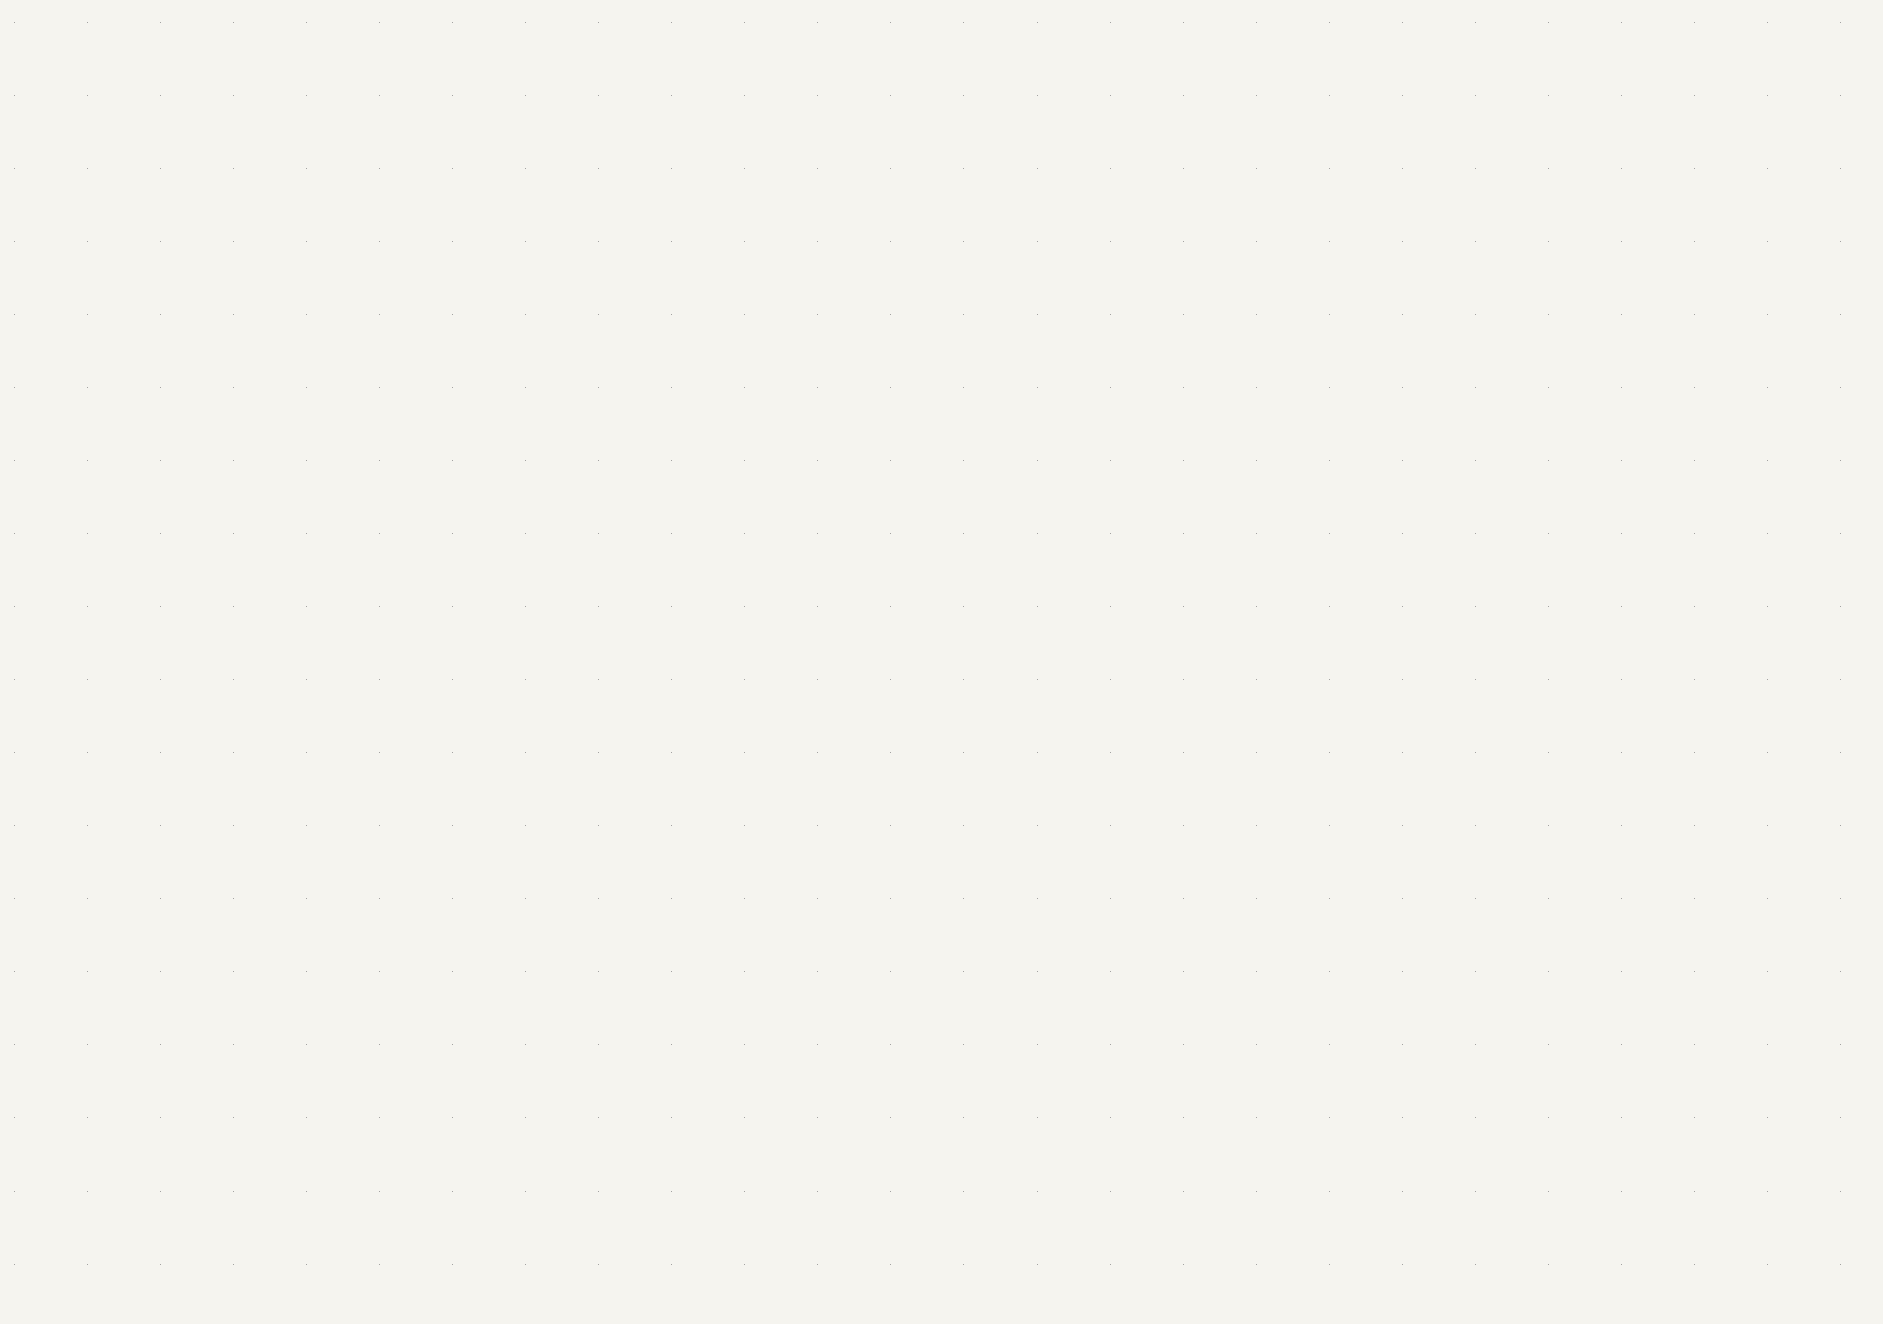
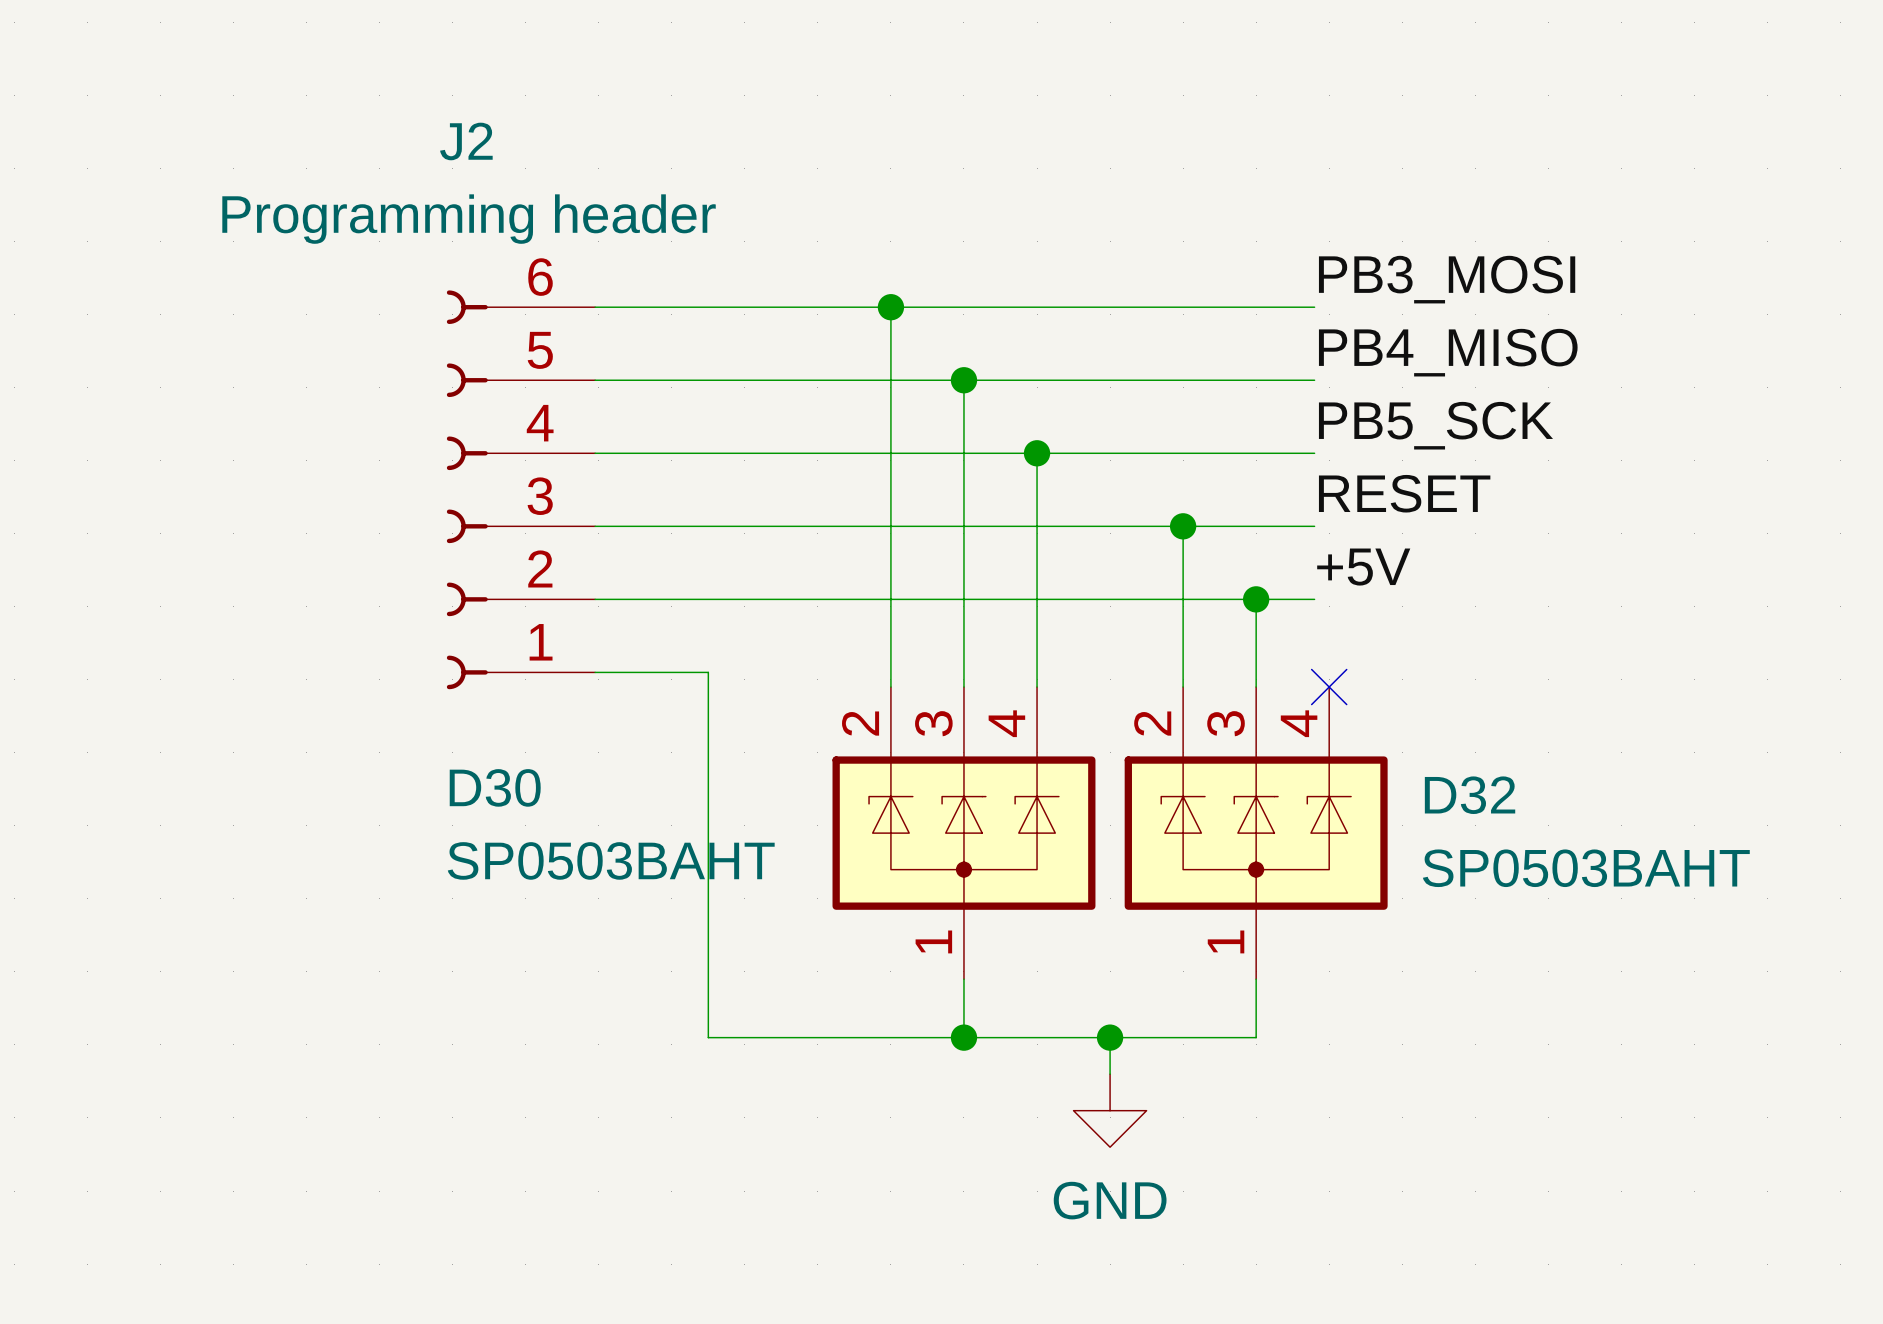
label: none -> PB3_MOSI (1447, 279)
wire: none -> (595, 307) (1314, 307)
wire: none -> (890, 307) (890, 687)
junction: none -> (890, 307)
label: none -> PB4_MISO (1448, 352)
wire: none -> (595, 380) (1314, 380)
wire: none -> (963, 380) (963, 687)
junction: none -> (963, 380)
label: none -> PB5_SCK (1435, 425)
wire: none -> (595, 453) (1314, 453)
wire: none -> (1037, 453) (1037, 687)
junction: none -> (1037, 453)
J2: none -> Programming header (520, 489)
label: none -> RESET (1404, 493)
wire: none -> (595, 526) (1314, 526)
wire: none -> (1183, 526) (1183, 687)
junction: none -> (1183, 526)
label: none -> +5V (1363, 567)
wire: none -> (595, 599) (1314, 599)
wire: none -> (1256, 599) (1256, 687)
junction: none -> (1256, 599)
wire: none -> (595, 672) (708, 672) (708, 1037) (1256, 1037) (1256, 979)
no-connect mark: none -> (1329, 687)
D30: none -> SP0503BAHT (963, 833)
D32: none -> SP0503BAHT (1256, 833)
wire: none -> (963, 979) (963, 1037)
junction: none -> (963, 1037)
wire: none -> (1110, 1037) (1110, 1074)
junction: none -> (1110, 1037)
power symbol: none -> GND (1110, 1110)

